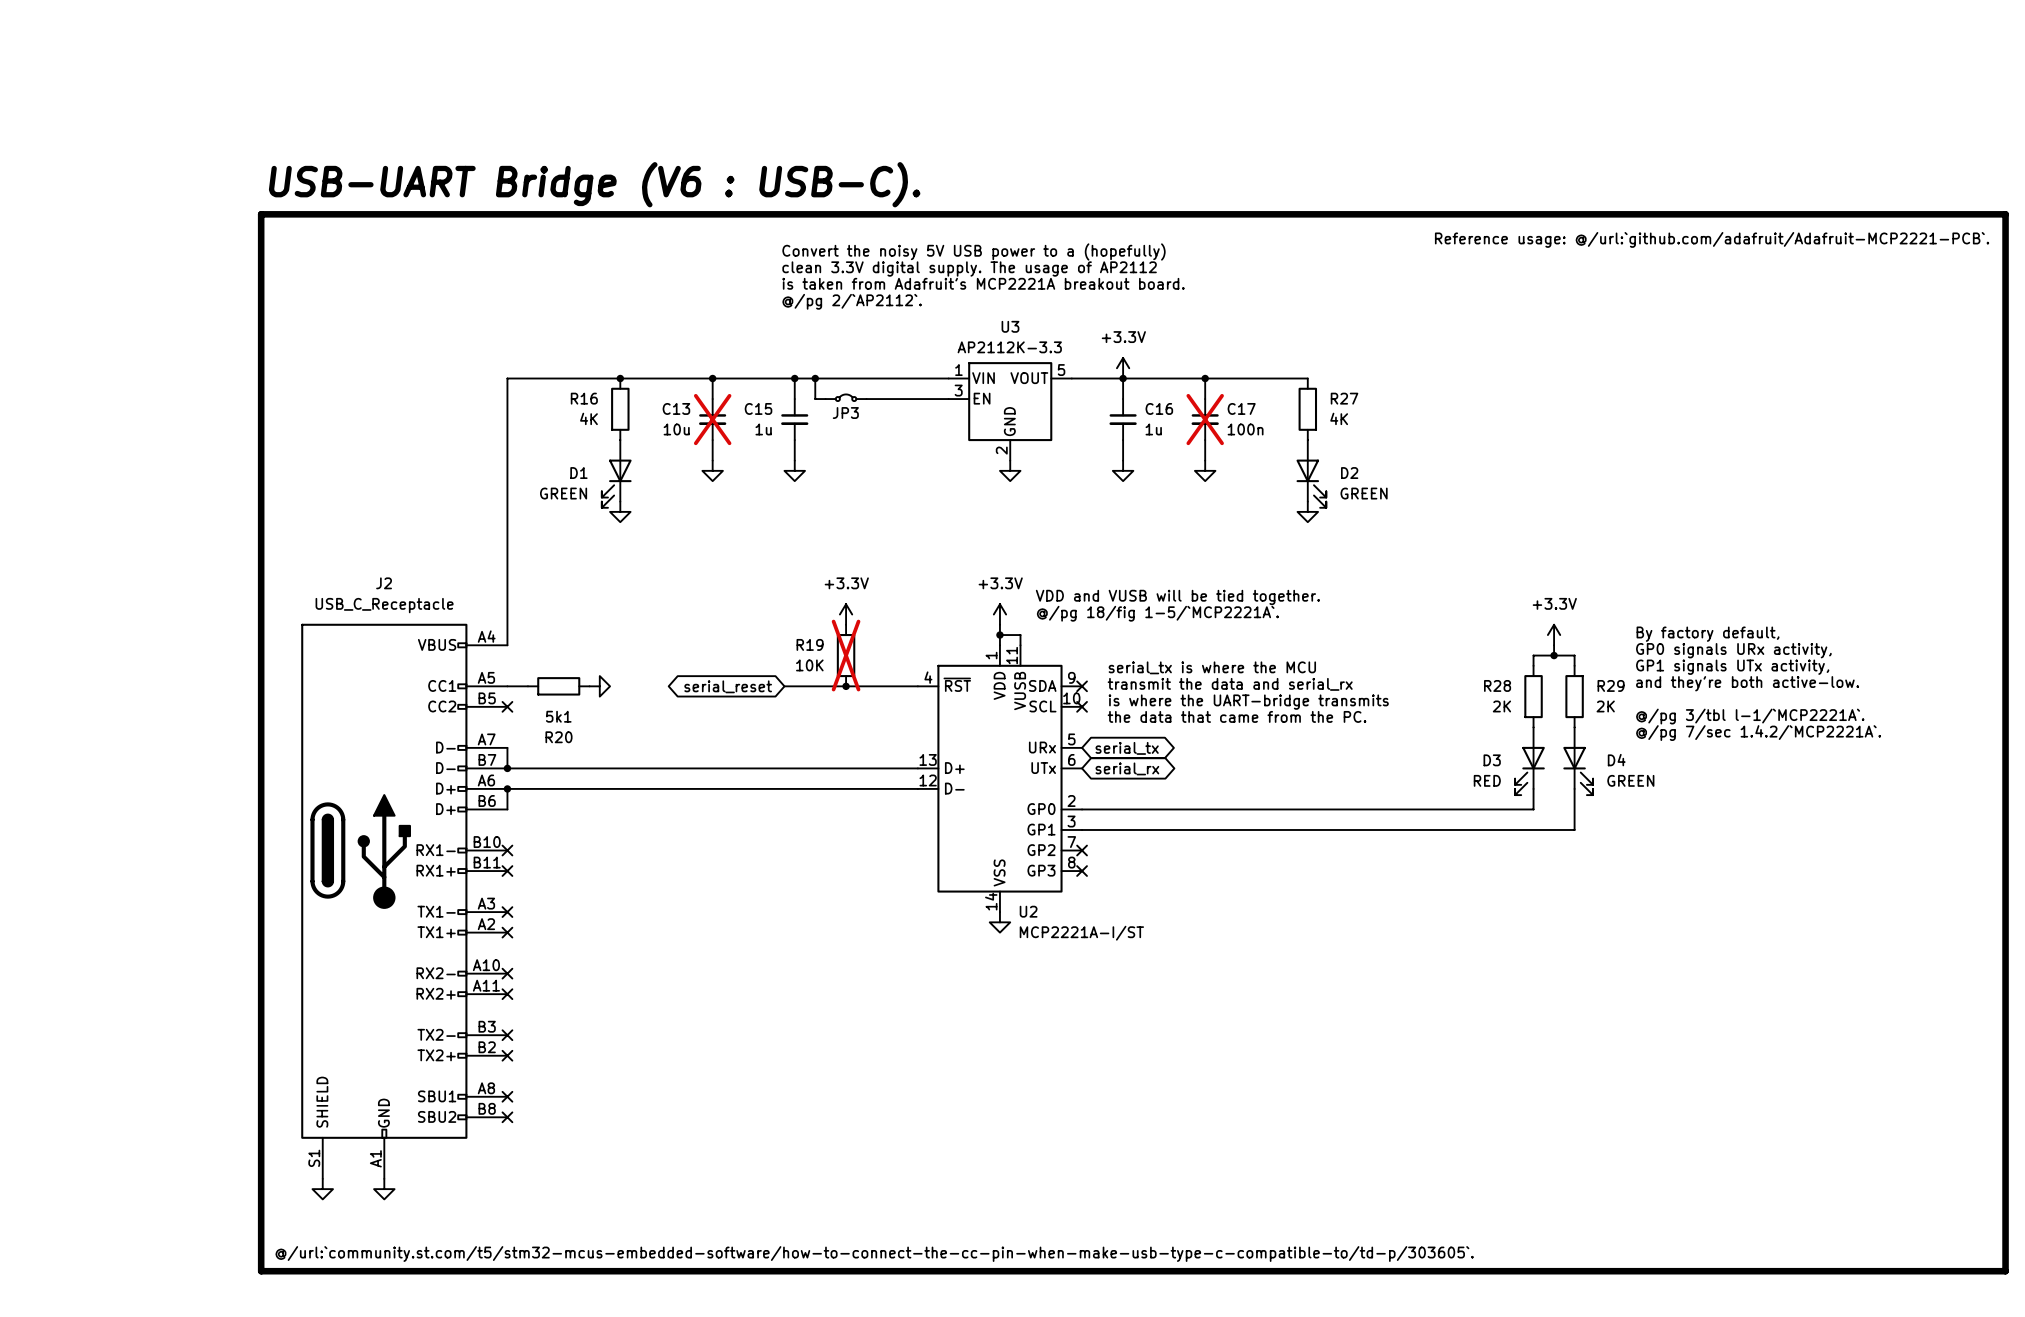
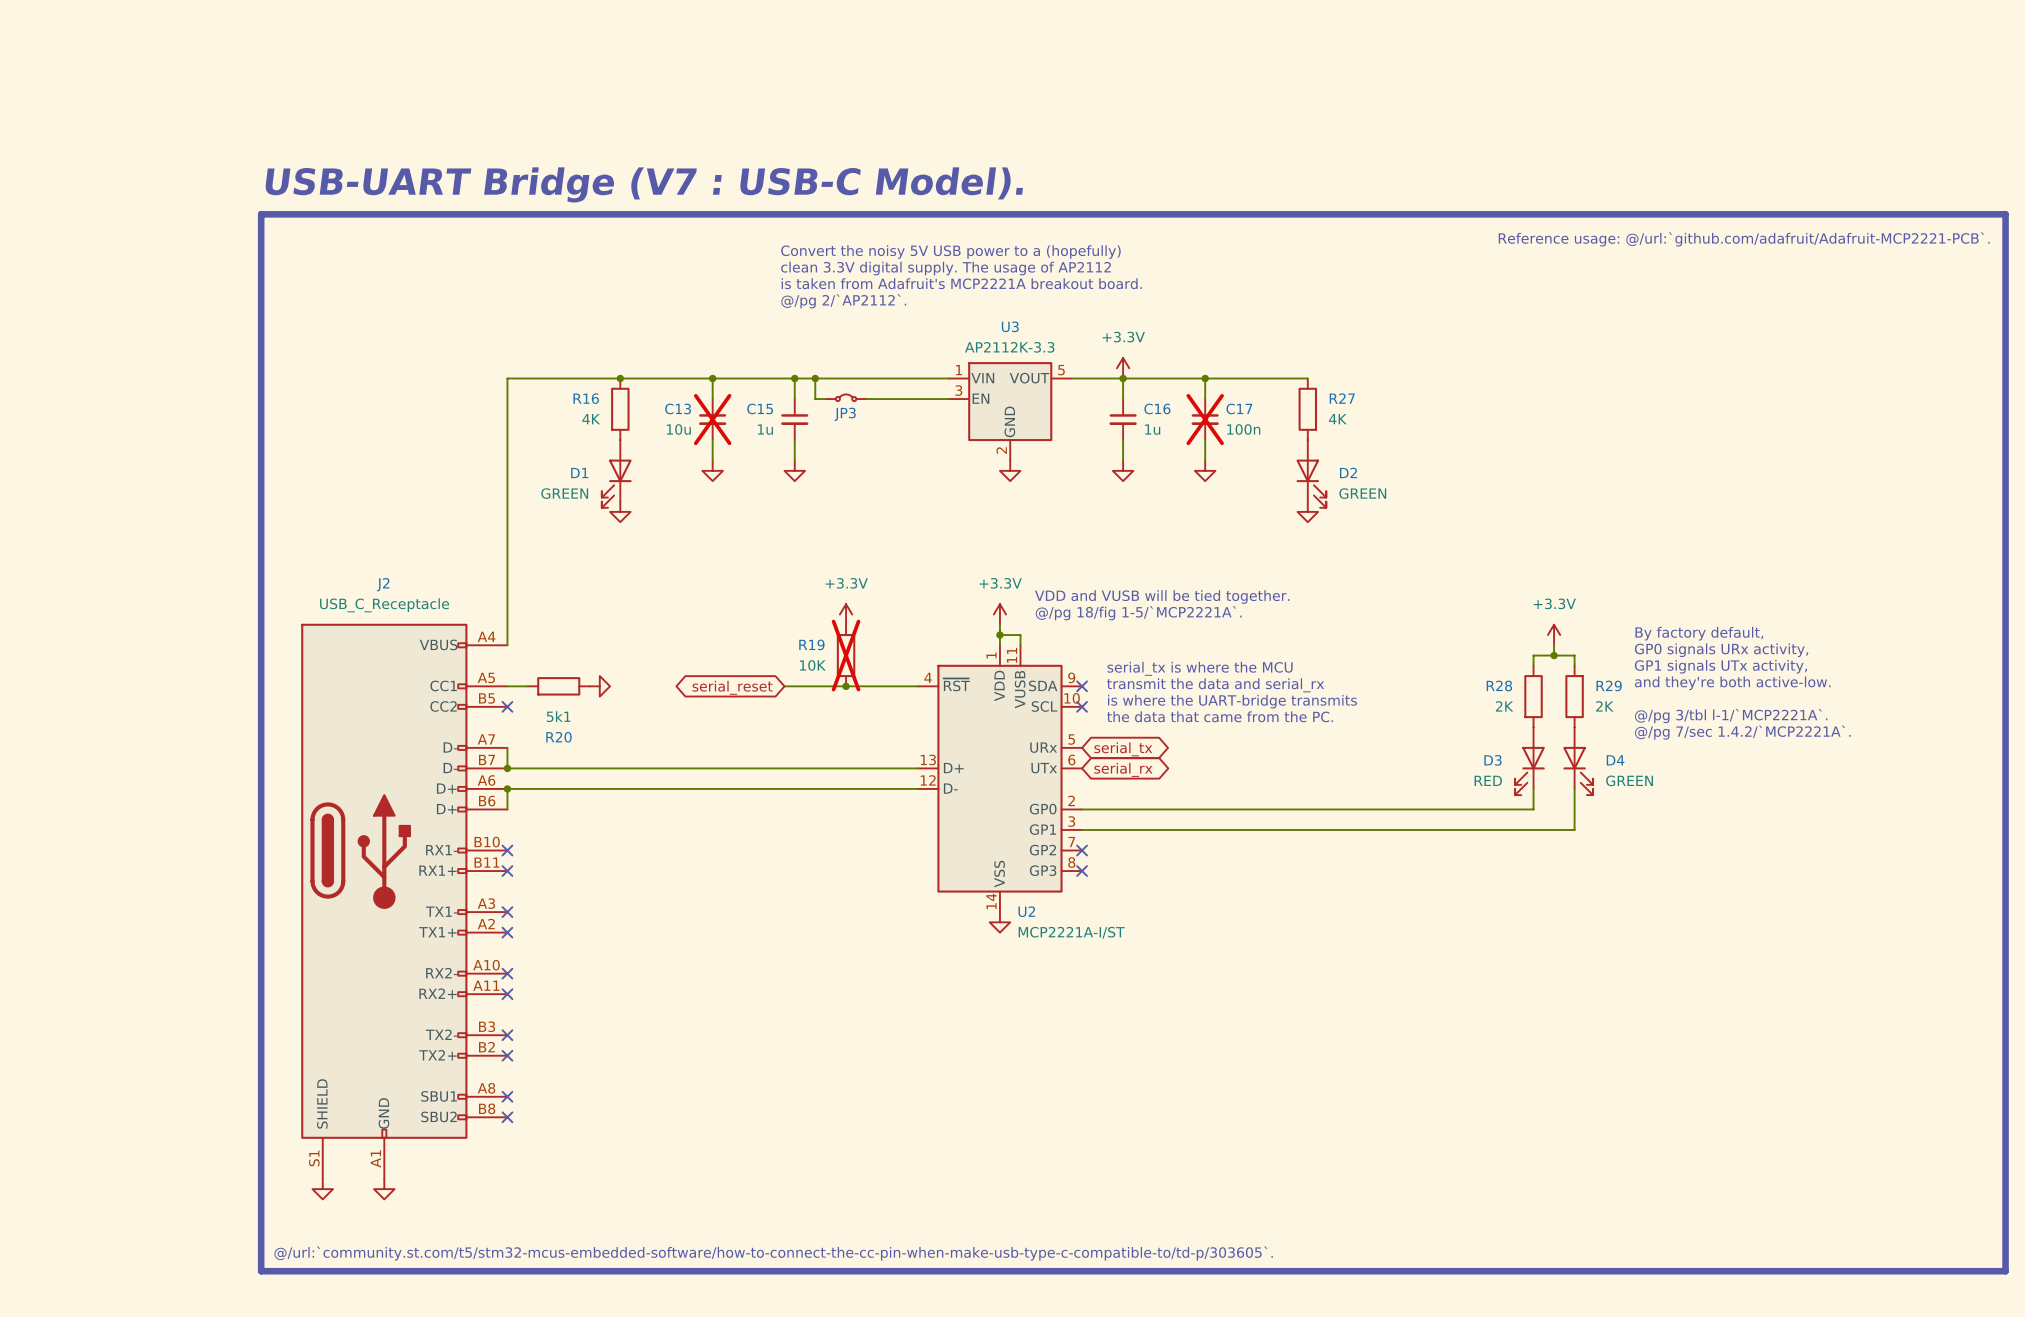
text: USB-UART Bridge (V6 : USB-C). (594, 184) -> USB-UART Bridge (V7 : USB-C Model). (644, 184)

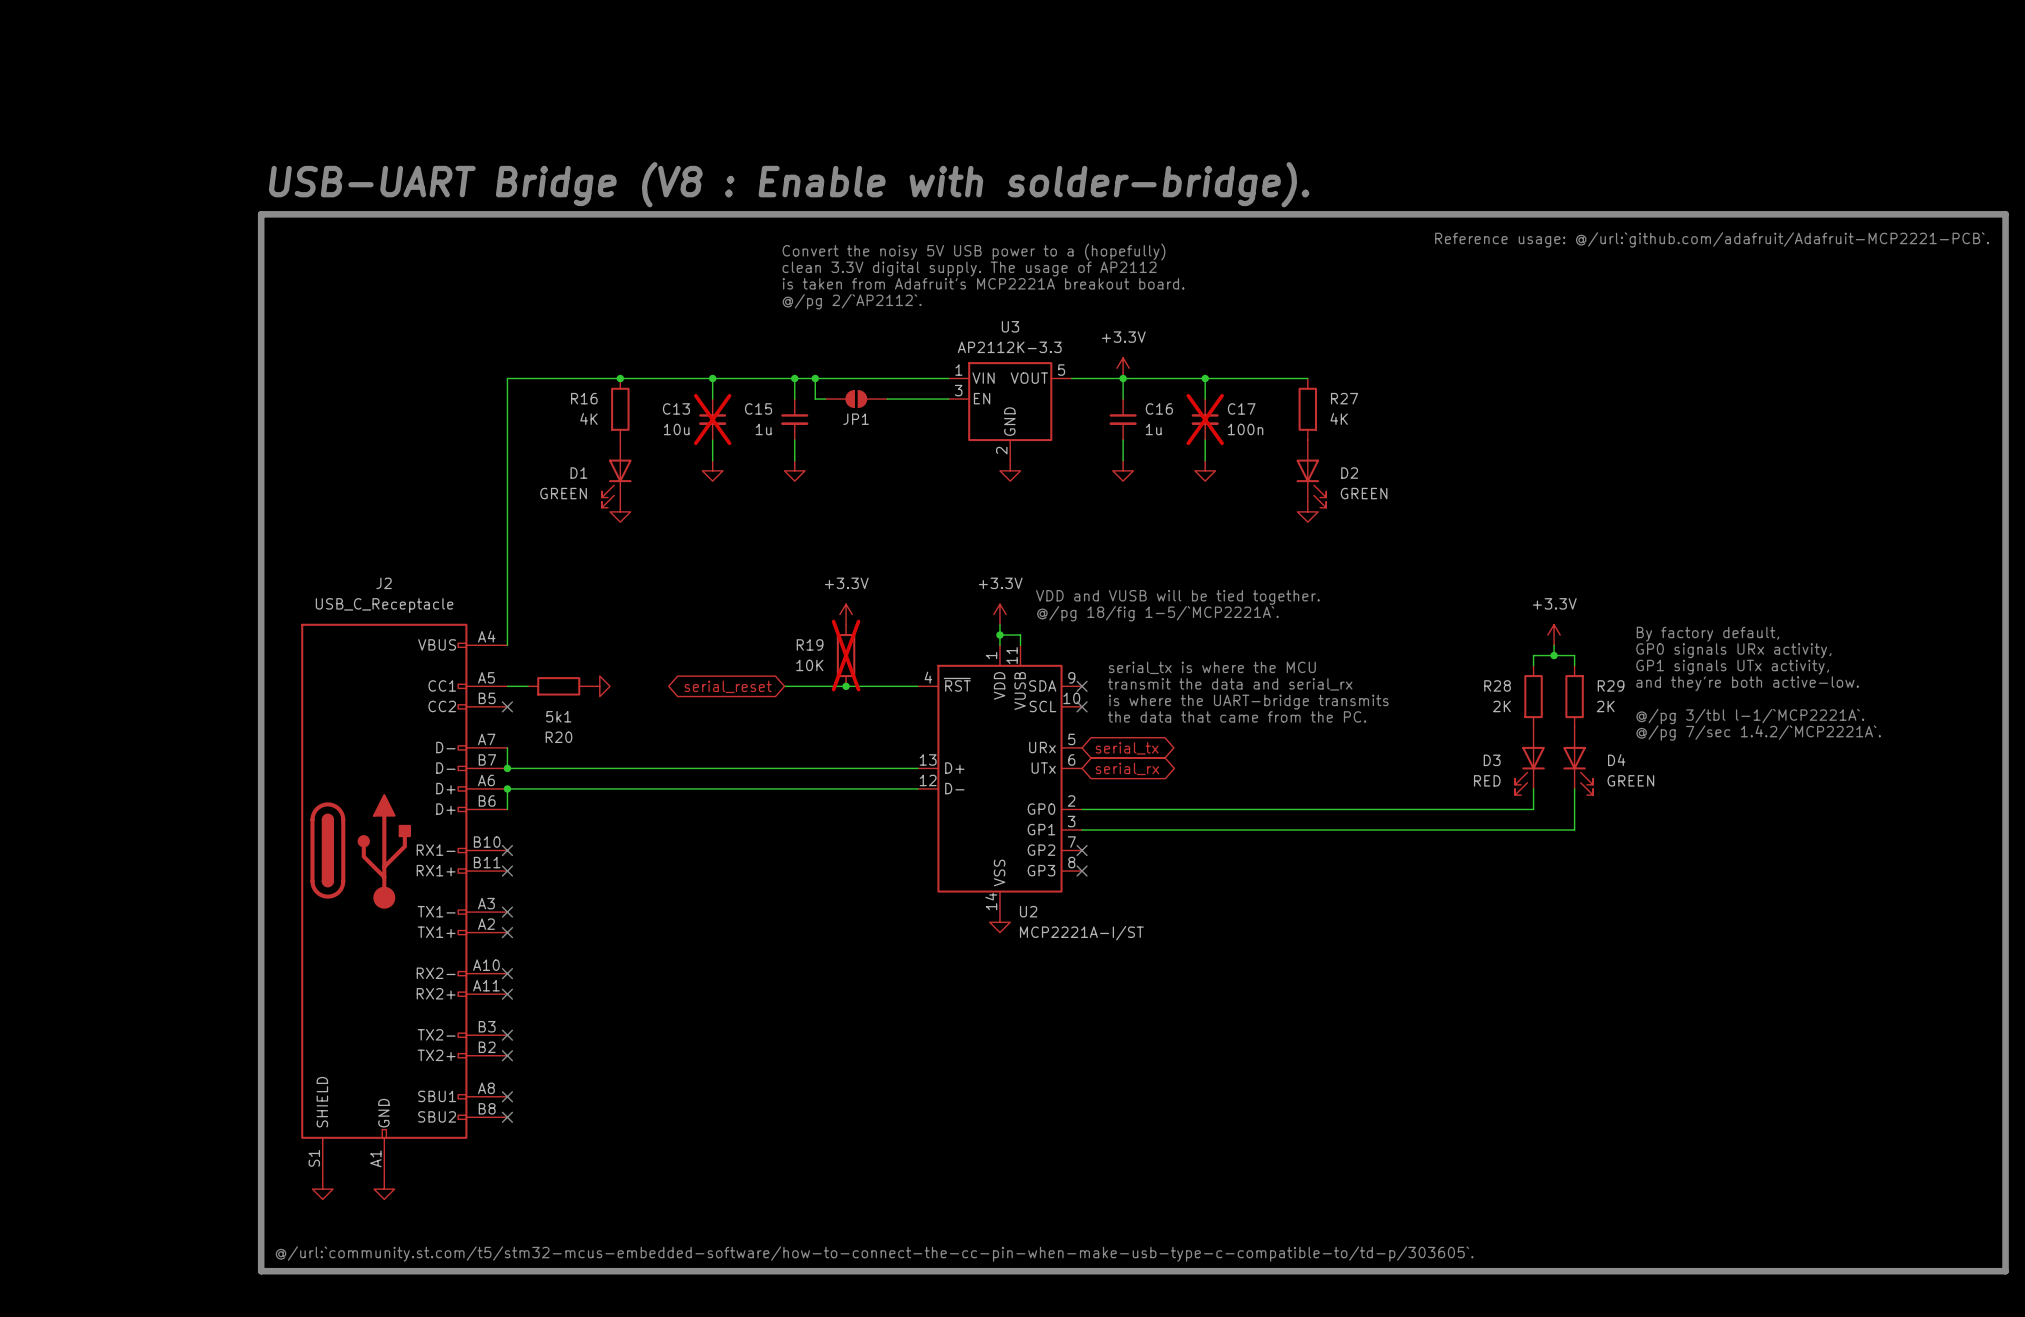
text: USB-UART Bridge (V7 : USB-C Model). (644, 184) -> USB-UART Bridge (V8 : Enable with solder-bridge). (789, 184)
JP3: (846, 397) -> none
JP1: none -> (856, 399)

